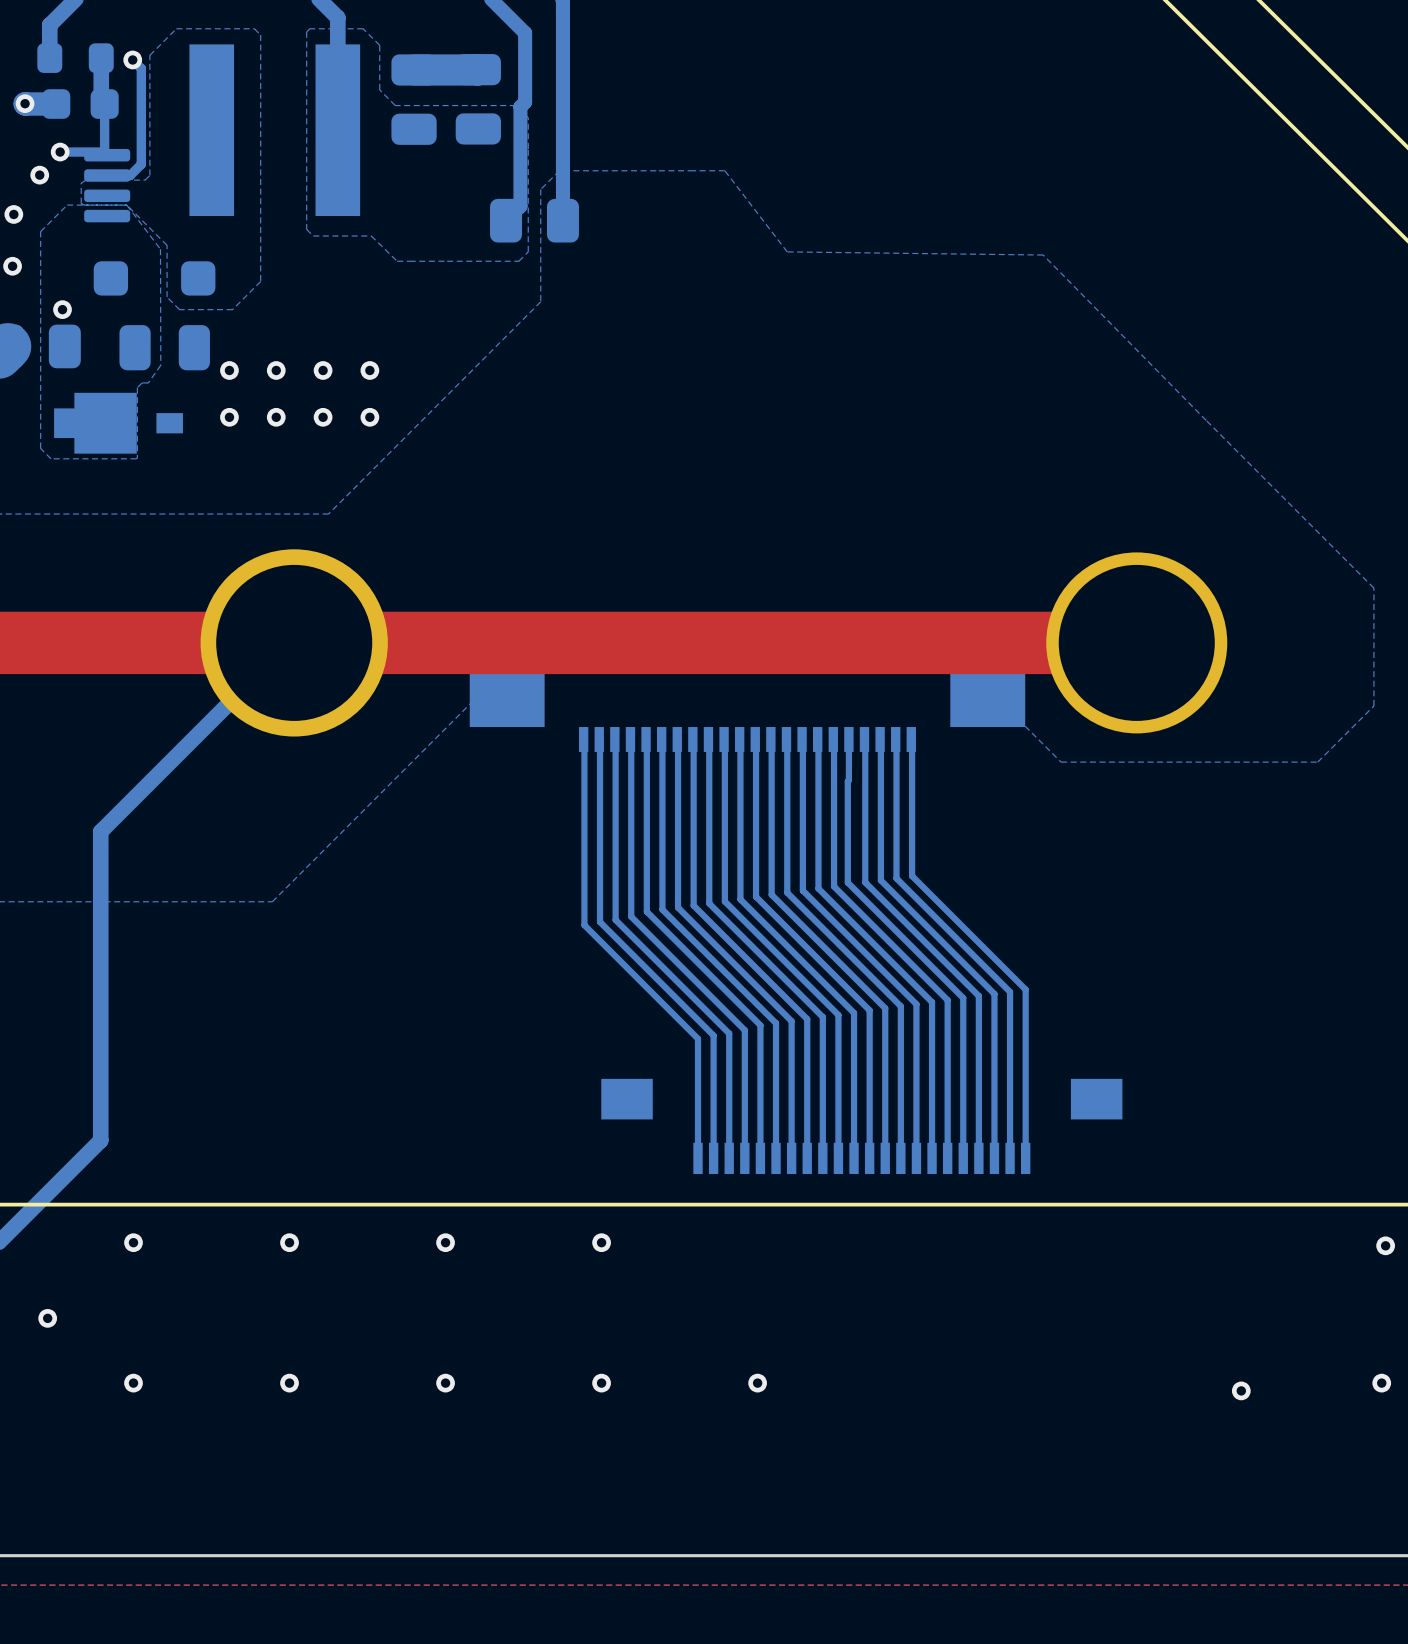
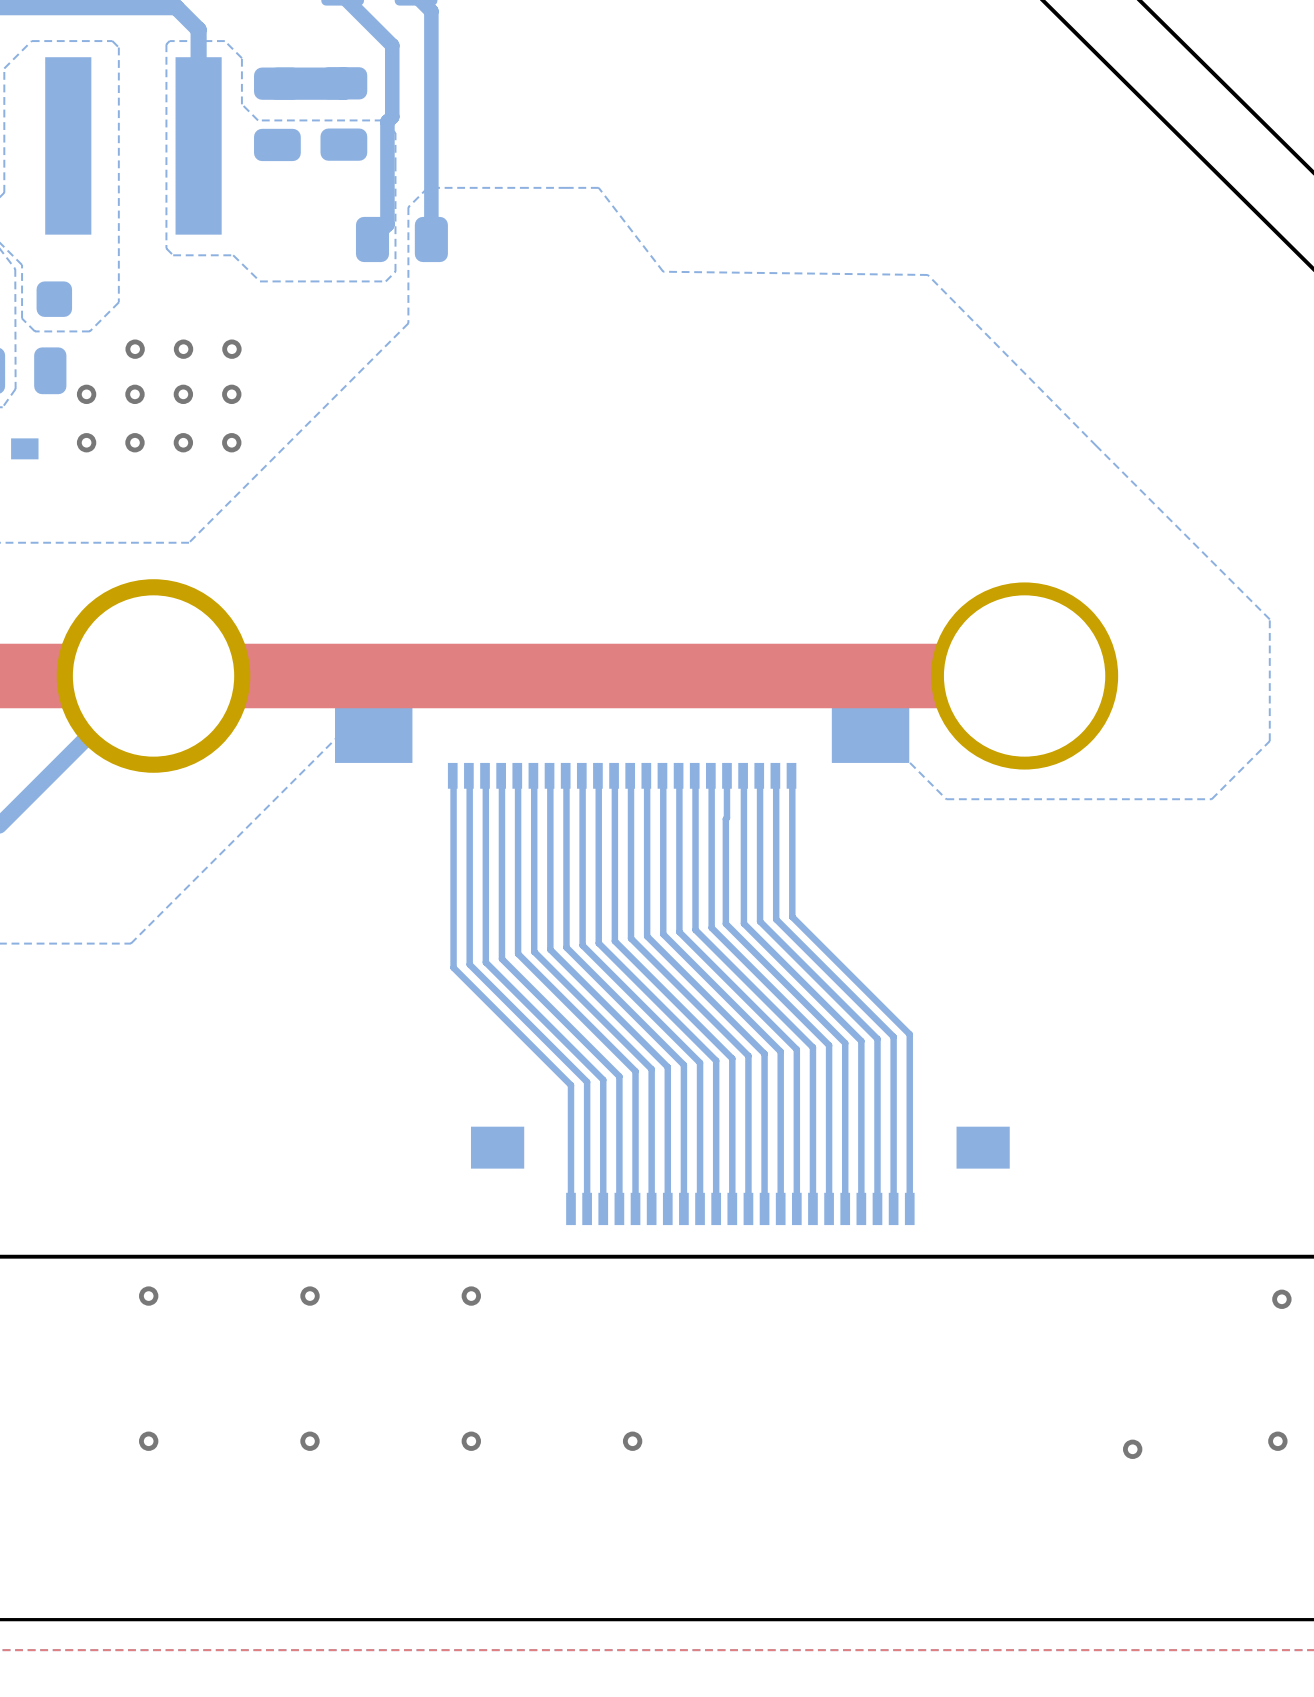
via: none -> (135, 349)
via: none -> (183, 349)
via: none -> (231, 349)

